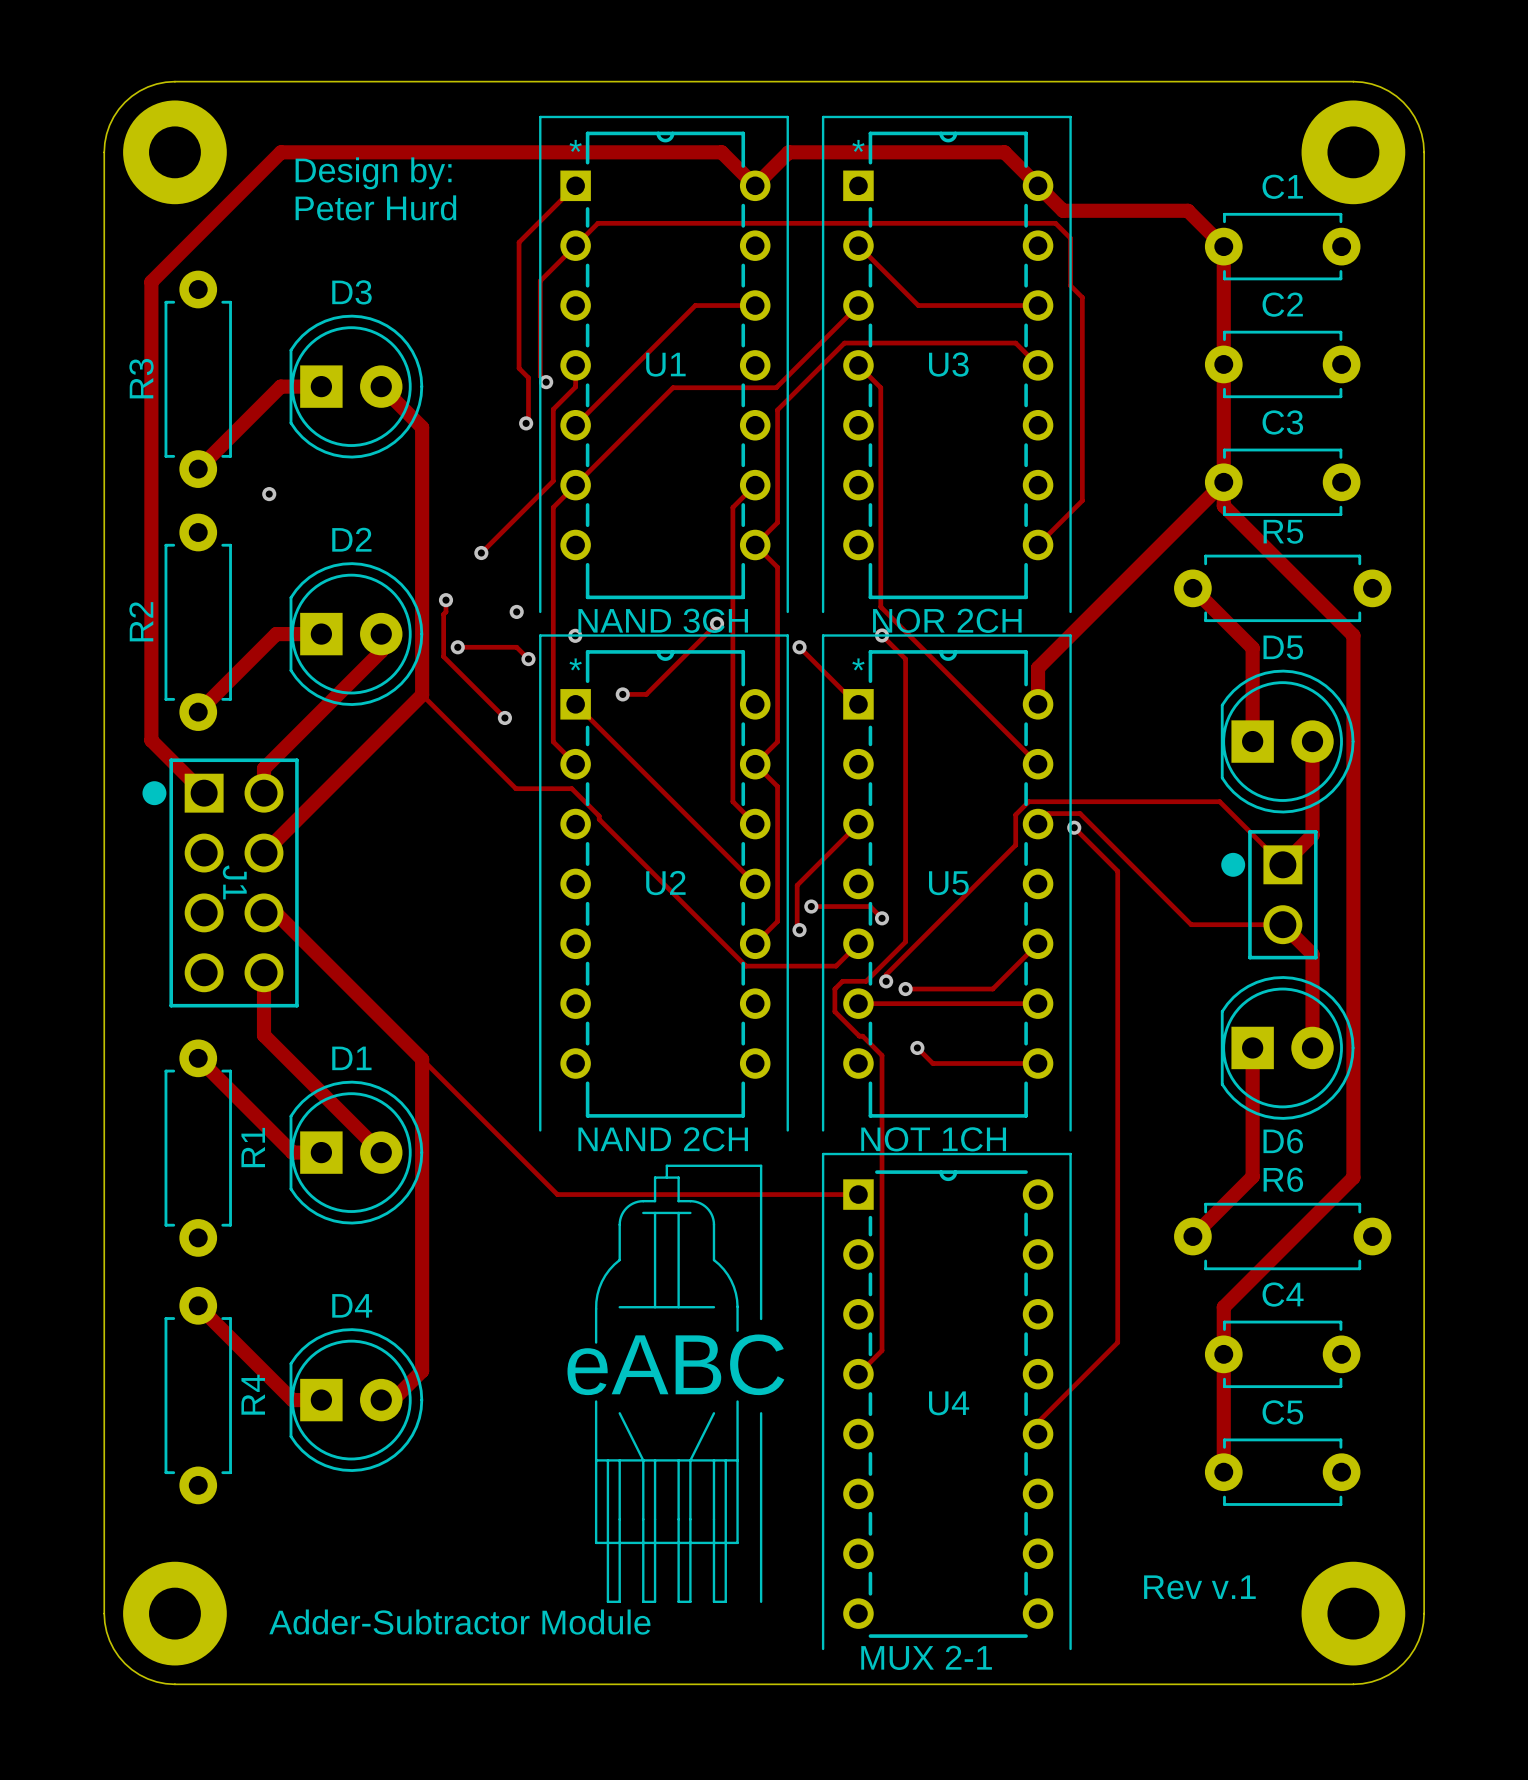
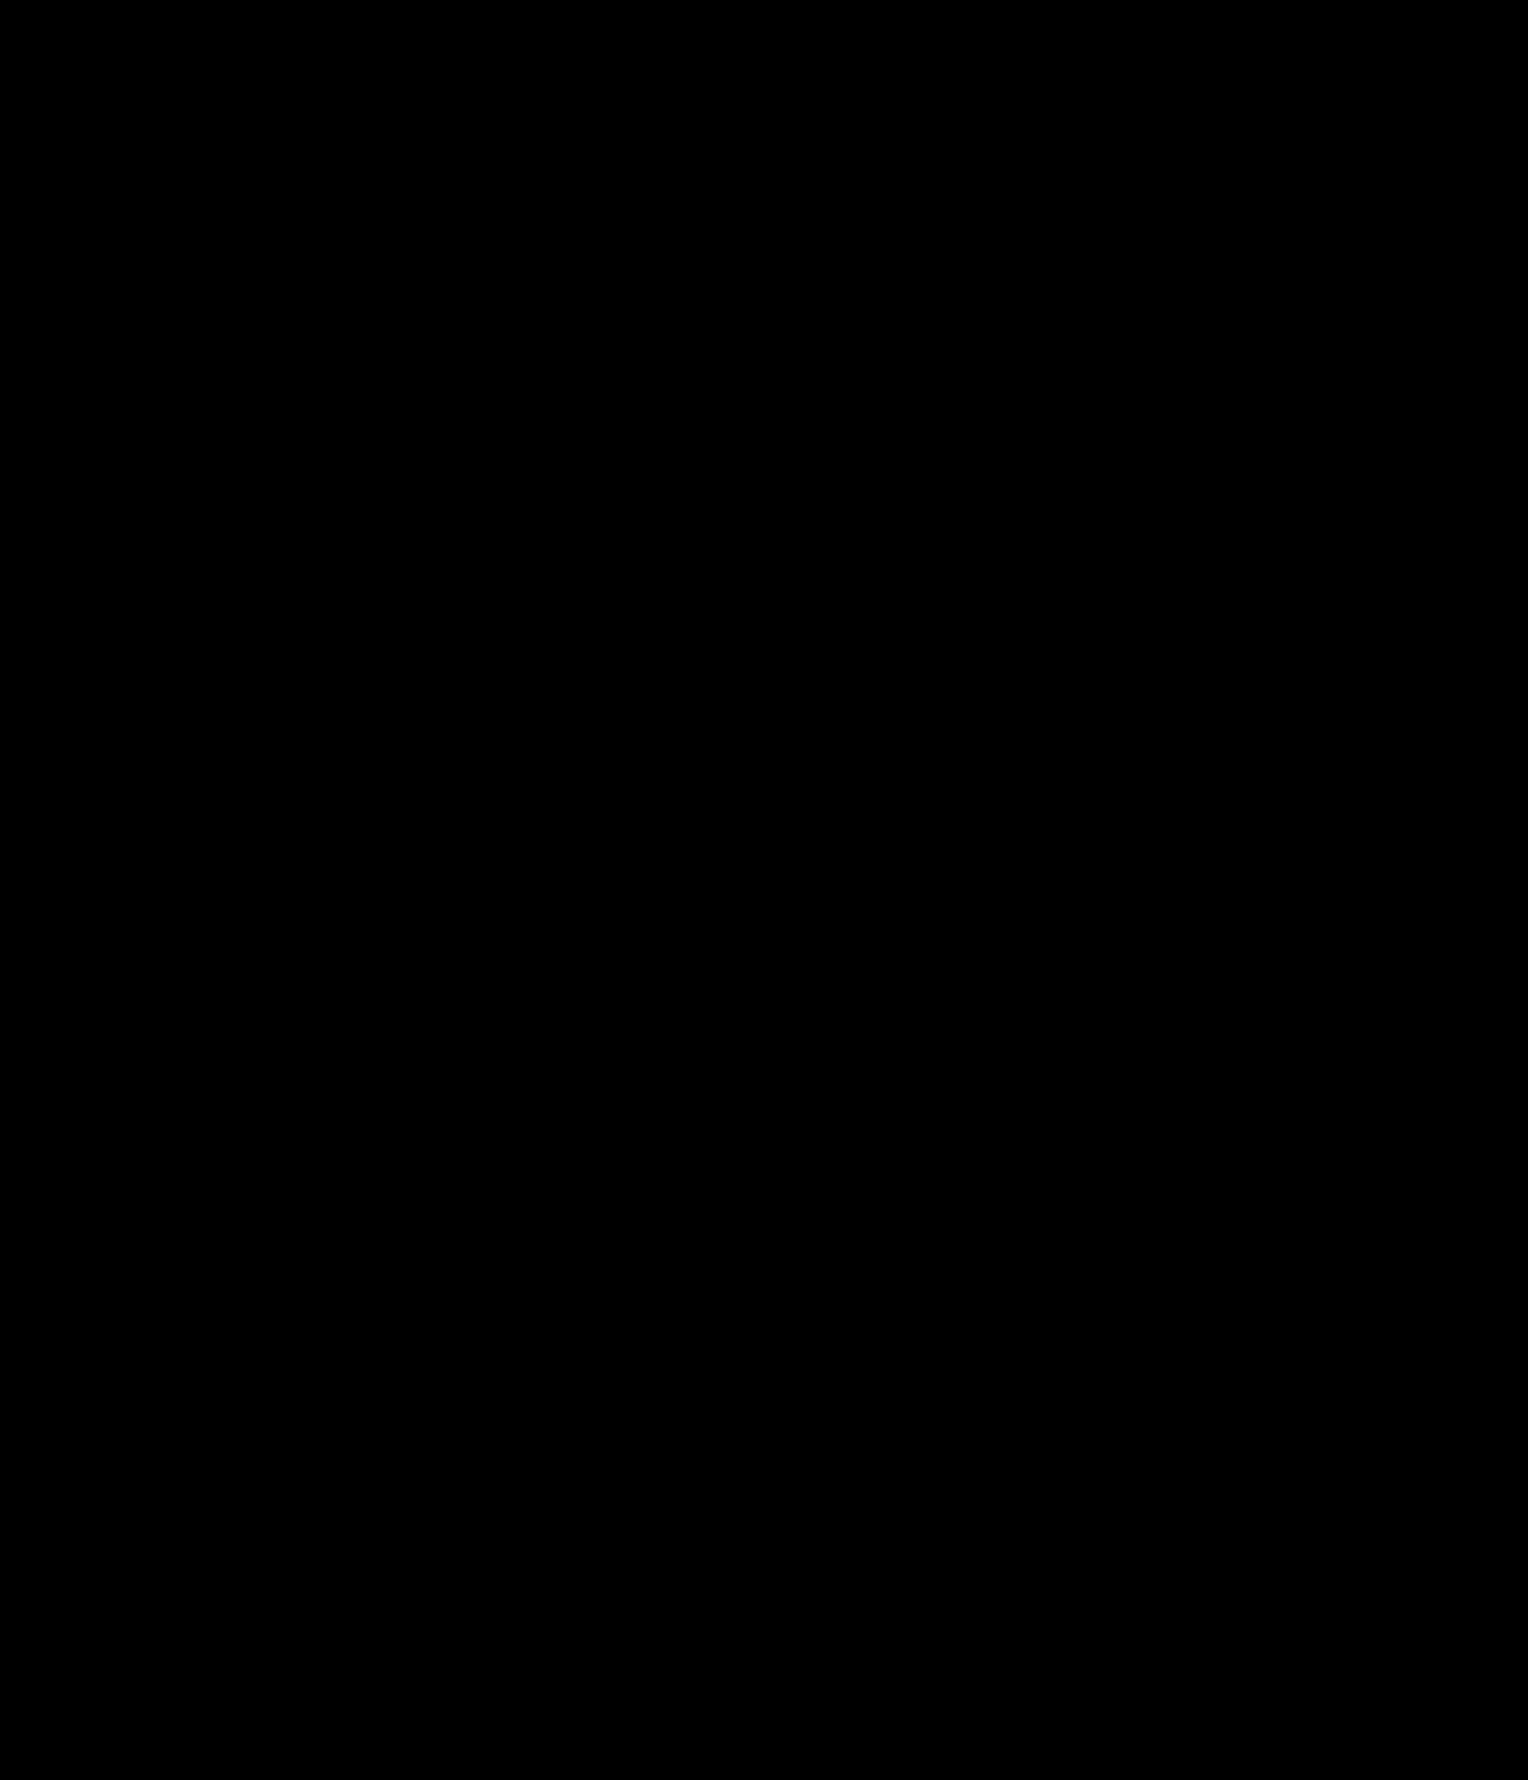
board edge: (174, 81) (1353, 81) (1380, 87) (1396, 96) (1409, 109) (1418, 125) (1424, 152) (1424, 1613) (1418, 1640) (1409, 1656) (1396, 1669) (1371, 1681) (1353, 1684) (174, 1684) (156, 1681) (139, 1674) (118, 1656) (106, 1631) (104, 1613) (104, 152) (109, 125) (124, 102) (147, 87) (174, 81) -> none
part: (174, 152) -> none
part: (1353, 152) -> none
text: Design by: (373, 173) -> none
track: (575, 185) (519, 242) (519, 368) (528, 377) (528, 421) (526, 423) -> none
text: Peter Hurd (375, 207) -> none
track: (858, 245) (918, 305) (1038, 305) -> none
C1: (1282, 246) -> none
track: (755, 305) (695, 305) (575, 425) -> none
track: (858, 305) (776, 387) (673, 387) (553, 507) (553, 741) (575, 764) -> none
C2: (1282, 364) -> none
track: (575, 365) (575, 386) (553, 409) (553, 481) (481, 553) -> none
U1: (665, 365) -> none
track: (858, 365) (880, 387) (880, 606) (1038, 764) -> none
U3: (948, 365) -> none
track: (1038, 365) (1015, 343) (844, 343) (777, 410) (777, 522) (755, 544) (777, 567) (777, 741) (755, 764) (777, 786) (777, 921) (755, 943) -> none
R3: (198, 379) -> none
track: (546, 382) (540, 376) (540, 281) (597, 223) (1055, 223) (1070, 238) (1070, 285) (1082, 297) (1082, 500) (1038, 544) -> none
via: (546, 382) -> none
track: (321, 386) (280, 386) (198, 469) -> none
D3: (356, 386) -> none
track: (381, 386) (422, 427) (422, 694) -> none
via: (526, 423) -> none
track: (1223, 482) (1038, 668) (1038, 704) -> none
C3: (1282, 482) -> none
track: (755, 485) (732, 507) (732, 801) (755, 824) -> none
via: (269, 494) -> none
via: (481, 553) -> none
track: (1192, 588) (1252, 648) (1252, 741) -> none
R5: (1282, 588) -> none
track: (446, 600) (446, 611) (443, 614) (443, 656) (504, 717) -> none
via: (446, 600) -> none
via: (516, 611) -> none
line: (540, 611) (540, 116) (787, 116) (787, 611) -> none
line: (823, 611) (823, 116) (1070, 116) (1070, 611) -> none
text: NAND 3CH (663, 620) -> none
text: NOR 2CH (947, 620) -> none
R2: (198, 622) -> none
track: (717, 623) (646, 694) (622, 694) -> none
via: (717, 623) -> none
track: (321, 634) (276, 634) (198, 712) -> none
D2: (356, 634) -> none
track: (381, 634) (381, 651) (264, 768) (264, 793) -> none
via: (575, 635) -> none
track: (882, 635) (905, 659) (905, 941) (866, 981) (842, 981) (834, 989) (834, 1011) (882, 1055) (882, 1350) (858, 1374) -> none
via: (882, 635) -> none
track: (457, 647) (516, 647) (528, 659) -> none
via: (457, 647) -> none
track: (799, 647) (858, 704) -> none
via: (799, 647) -> none
via: (528, 659) -> none
track: (422, 694) (515, 788) (571, 788) (599, 816) (599, 819) (745, 966) (836, 966) (858, 943) -> none
track: (422, 694) (264, 853) -> none
via: (622, 694) -> none
track: (575, 704) (755, 883) -> none
via: (504, 717) -> none
D5: (1287, 741) -> none
track: (1312, 741) (1312, 835) (1282, 864) (1219, 801) (1028, 801) (1015, 814) (1015, 845) (886, 974) (886, 981) -> none
track: (204, 793) (151, 740) (151, 281) (281, 152) (721, 152) (755, 185) (788, 152) (1004, 152) (1063, 210) (1187, 210) (1223, 246) (1223, 505) (1353, 635) (1353, 1177) (1223, 1307) (1223, 1472) -> none
track: (858, 824) (797, 885) (797, 927) (799, 930) -> none
track: (1038, 824) (1048, 813) (1080, 813) (1191, 924) (1282, 924) (1312, 954) (1312, 1047) -> none
track: (1074, 827) (1117, 871) (1117, 1342) (1038, 1422) (1038, 1434) -> none
via: (1074, 827) -> none
J1: (220, 882) -> none
U2: (665, 883) -> none
U5: (948, 883) -> none
part: (1269, 894) -> none
track: (811, 906) (870, 906) (882, 918) -> none
via: (811, 906) -> none
track: (275, 912) (422, 1059) -> none
via: (882, 918) -> none
via: (799, 930) -> none
track: (1038, 943) (992, 989) (905, 989) -> none
track: (264, 972) (264, 1035) (381, 1152) -> none
via: (886, 981) -> none
via: (905, 989) -> none
track: (858, 1003) (1038, 1003) -> none
track: (917, 1047) (932, 1063) (1038, 1063) -> none
via: (917, 1047) -> none
track: (1252, 1047) (1252, 1176) (1192, 1236) -> none
D6: (1287, 1047) -> none
track: (198, 1058) (292, 1152) (321, 1152) -> none
track: (422, 1059) (557, 1194) (858, 1194) -> none
track: (422, 1059) (422, 1370) (393, 1400) -> none
line: (540, 1130) (540, 635) (787, 635) (787, 1130) -> none
line: (823, 1130) (823, 635) (1070, 635) (1070, 1130) -> none
text: NAND 2CH (663, 1139) -> none
text: NOT 1CH (933, 1139) -> none
R1: (198, 1148) -> none
D1: (356, 1152) -> none
drawing: [594, 1164, 763, 1604] -> none
R6: (1282, 1236) -> none
track: (198, 1305) (292, 1400) (321, 1400) -> none
C4: (1282, 1354) -> none
R4: (198, 1395) -> none
D4: (356, 1400) -> none
U4: (948, 1404) -> none
C5: (1282, 1472) -> none
text: Rev v.1 (1199, 1587) -> none
part: (174, 1613) -> none
part: (1353, 1613) -> none
text: Adder-Subtractor Module (459, 1622) -> none
line: (823, 1648) (823, 1154) (1070, 1154) (1070, 1648) -> none
text: MUX 2-1 (926, 1657) -> none

